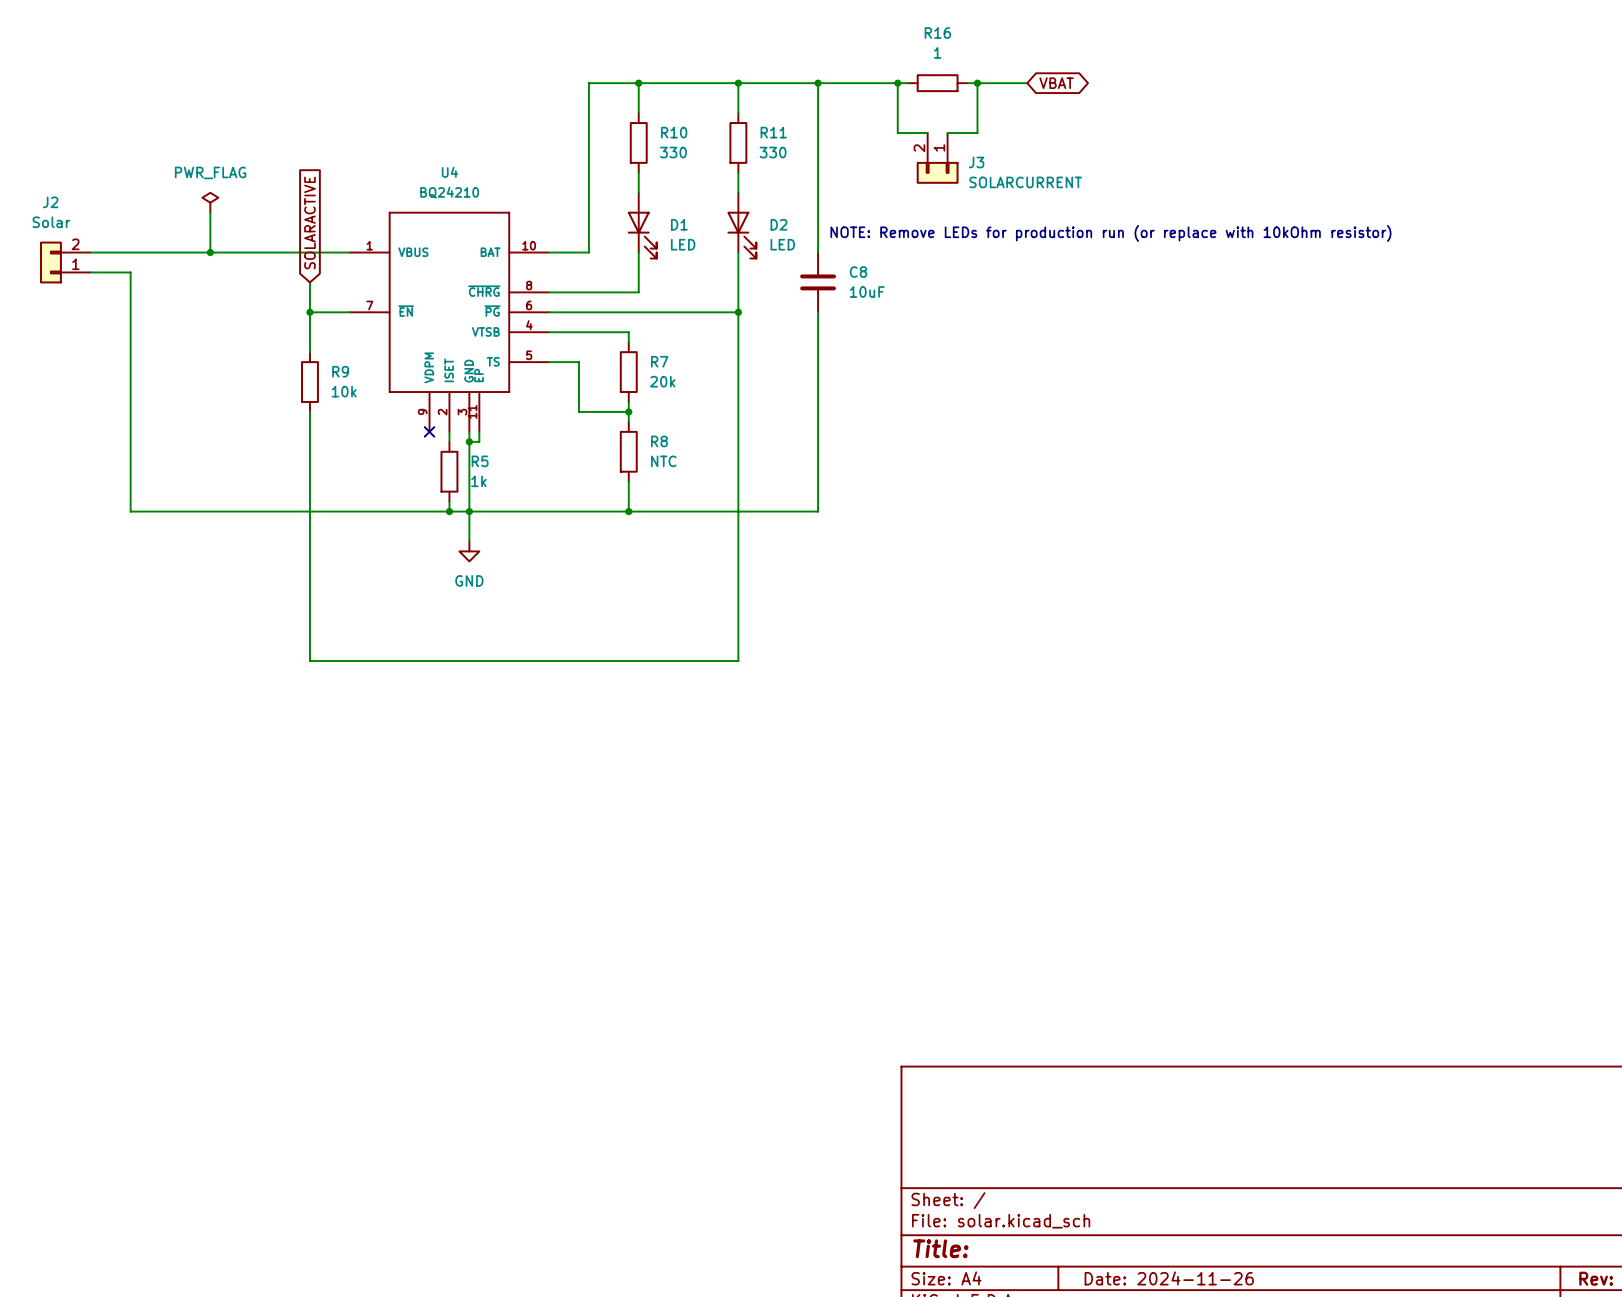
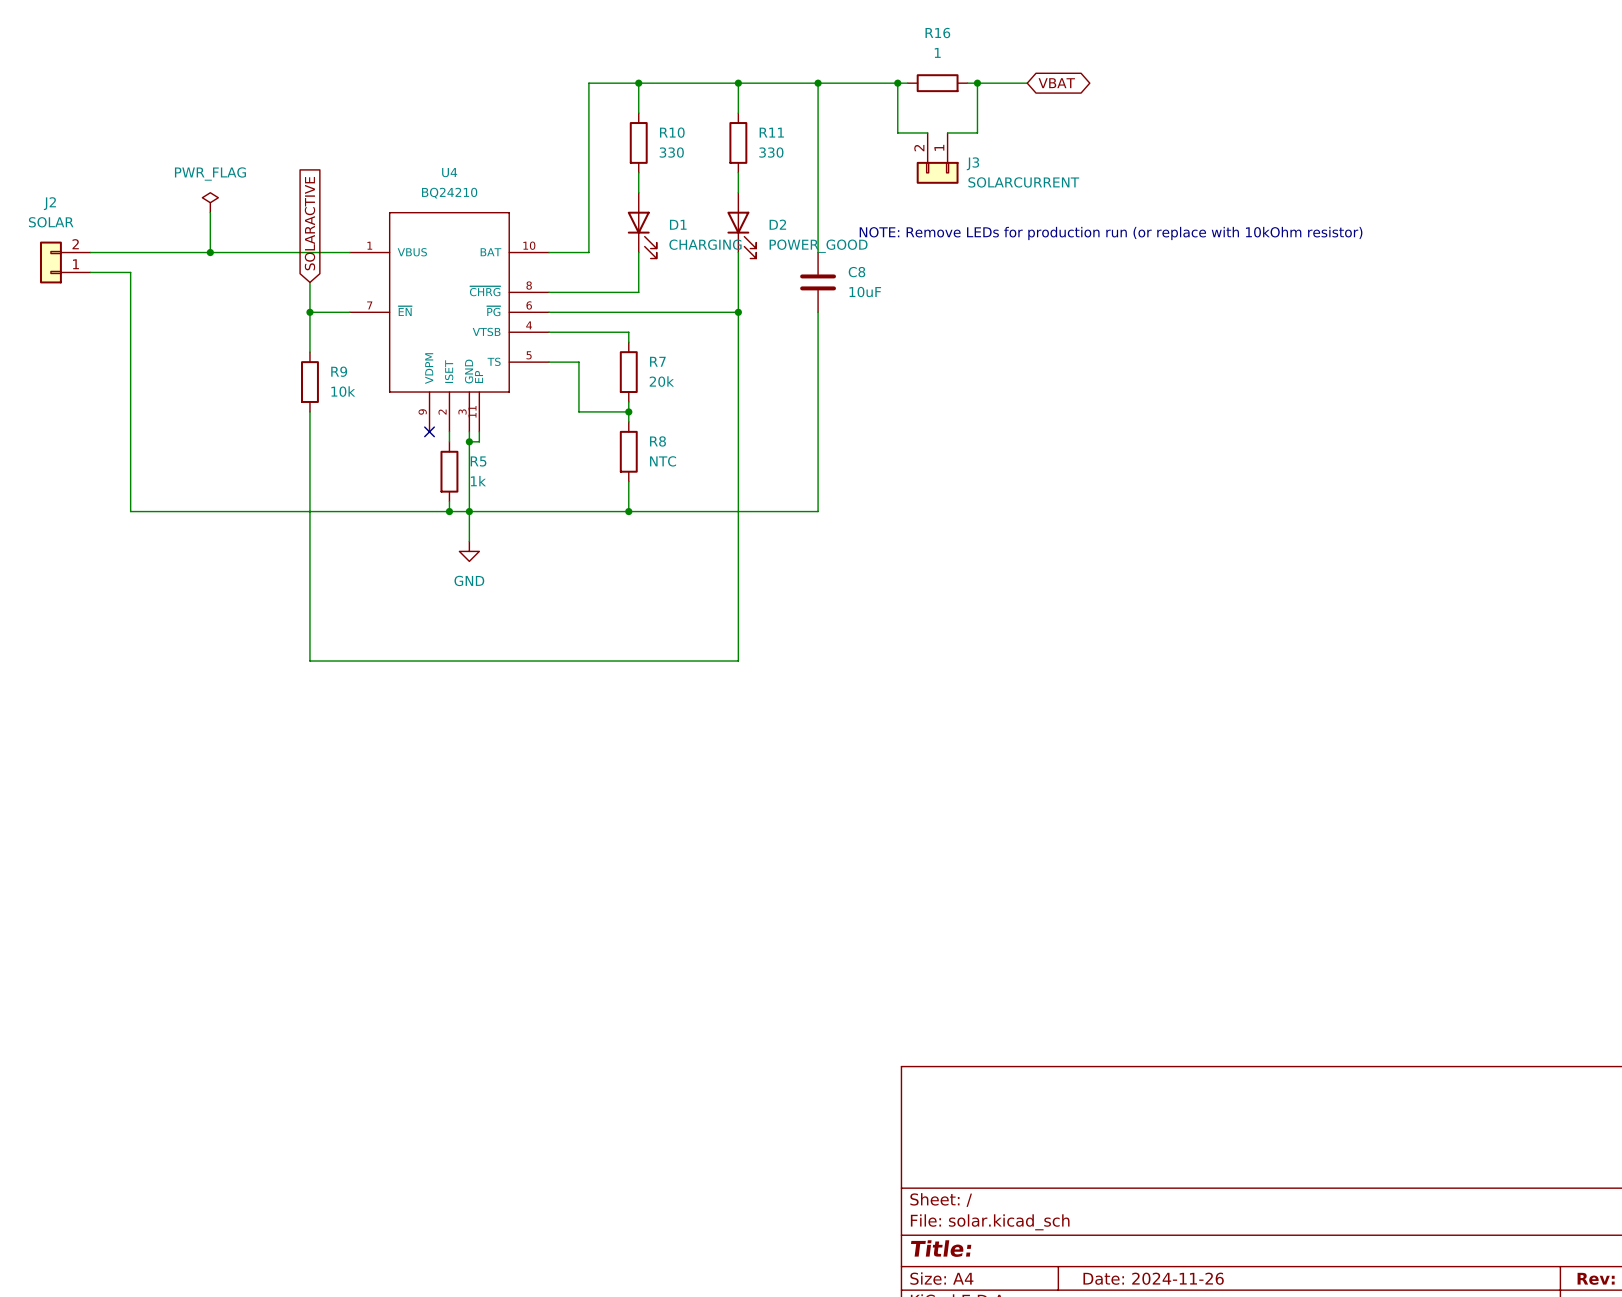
J2 value: Solar (51, 222) -> SOLAR (51, 222)
D1 value: LED (683, 244) -> CHARGING (705, 244)
D2 value: LED (782, 244) -> POWER_GOOD (818, 246)

